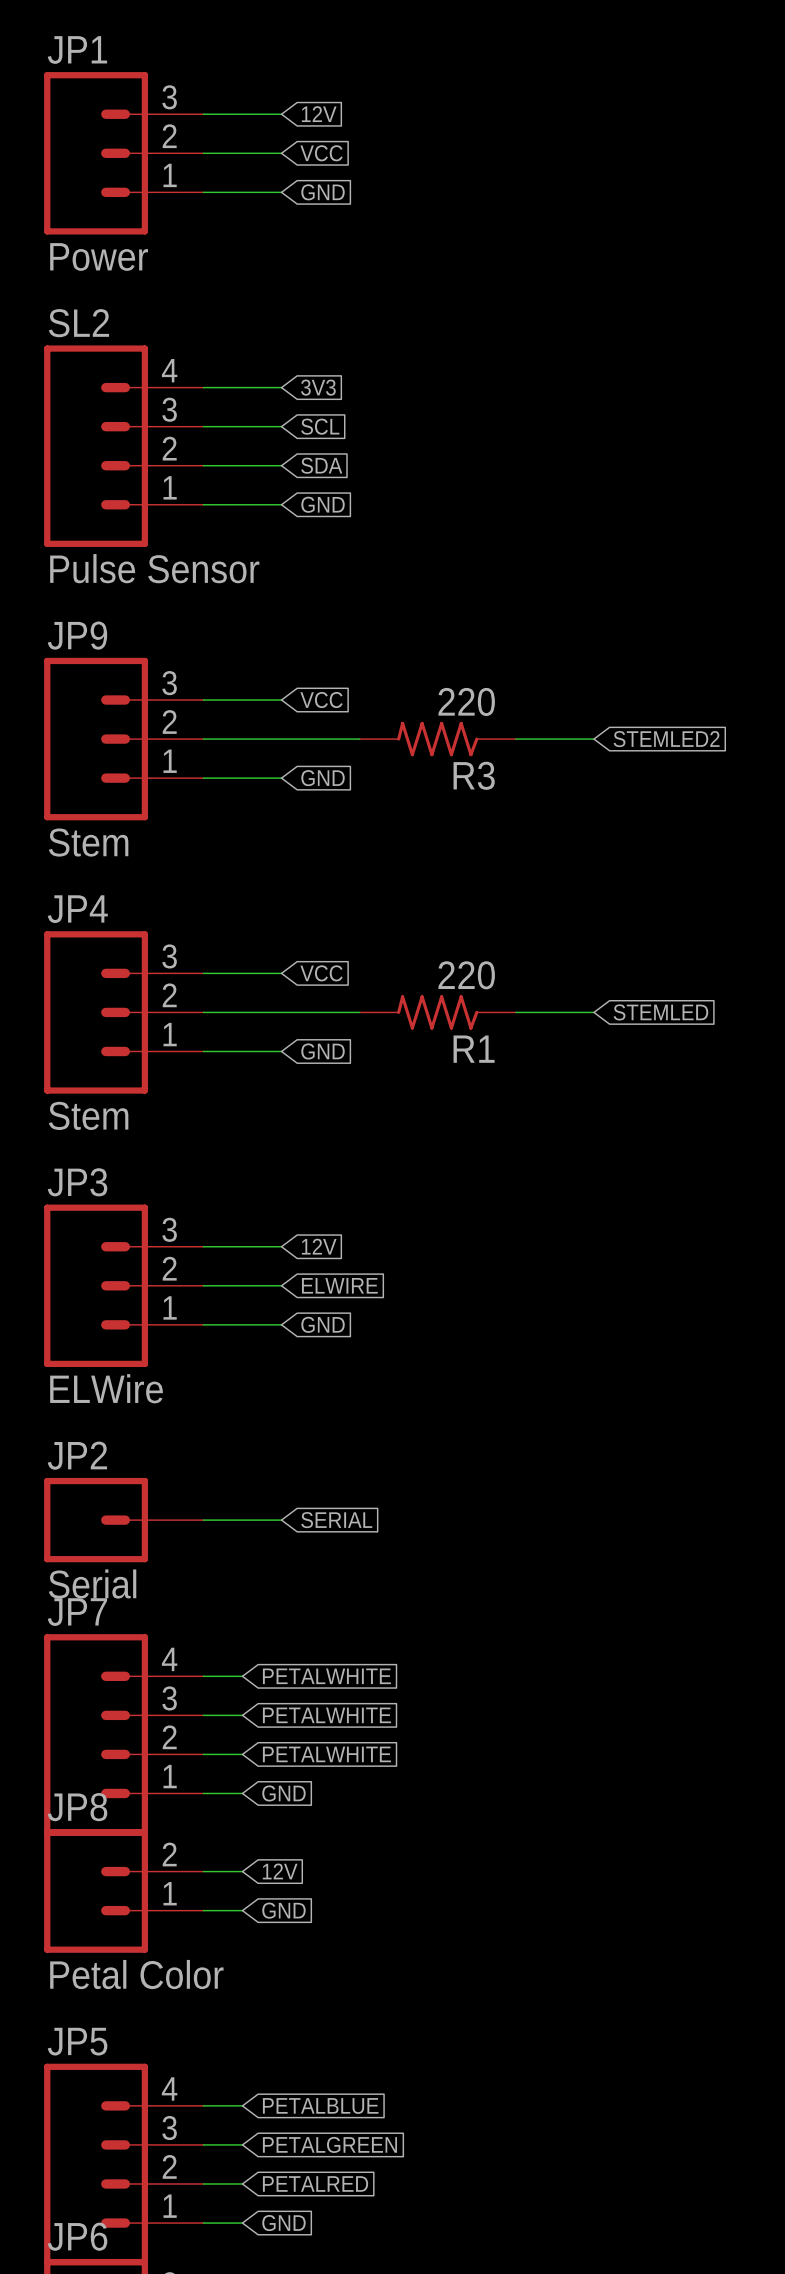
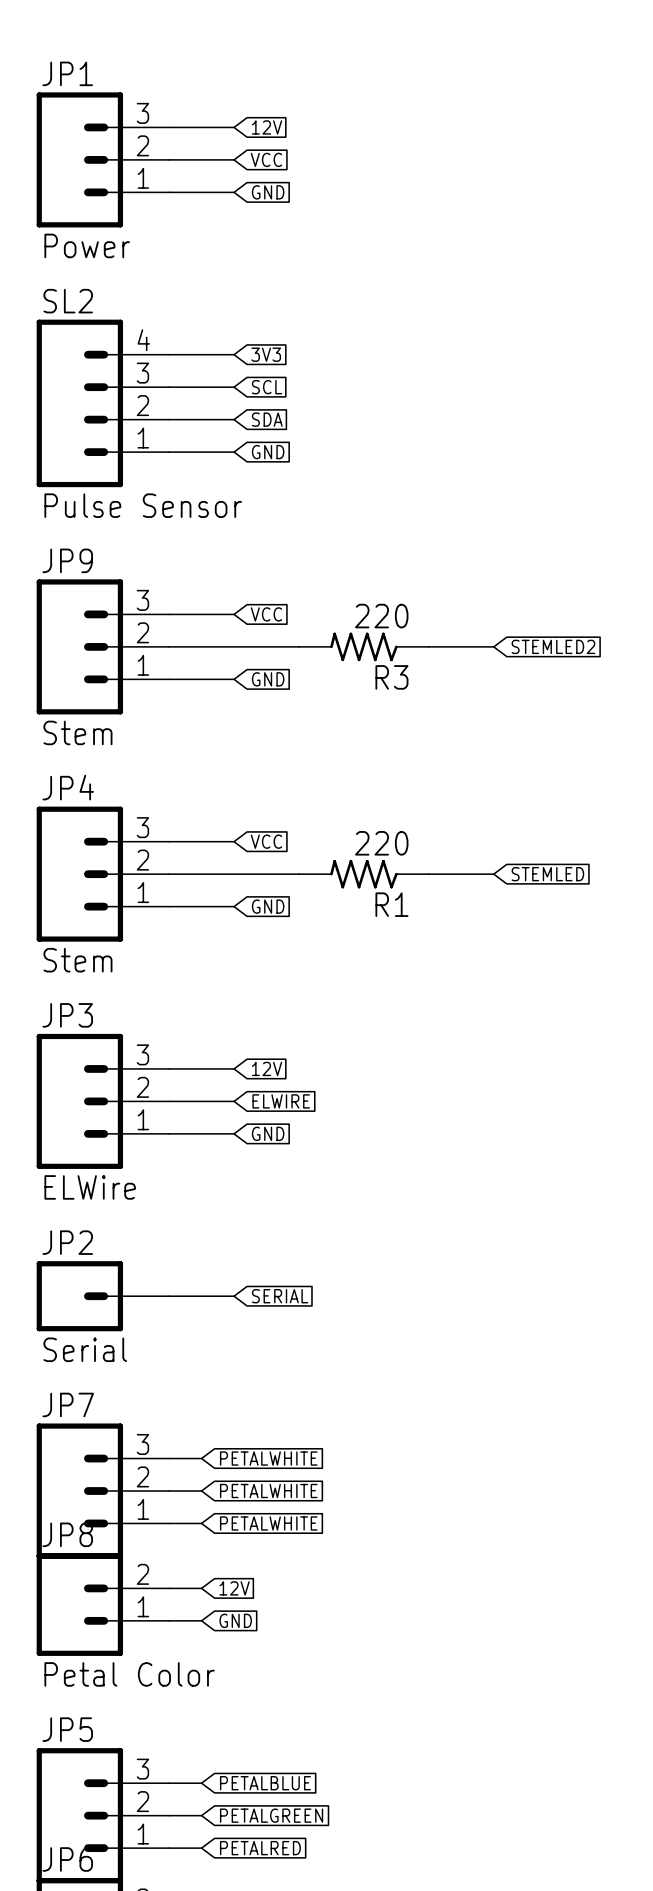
wire: (203, 114) (281, 114) -> none
global label: 12V (319, 114) -> none
JP1 position: (123, 153) -> (102, 159)
global label: VCC (321, 153) -> 12V (267, 127)
global label: GND (323, 192) -> VCC (266, 159)
global label: none -> GND (268, 192)
wire: (203, 387) (281, 387) -> (169, 192) (234, 192)
global label: 3V3 (318, 387) -> none
global label: SCL (320, 426) -> 3V3 (266, 354)
SL2 position: (123, 446) -> (102, 403)
global label: SDA (321, 465) -> SCL (267, 387)
global label: GND (323, 504) -> SDA (267, 419)
global label: none -> GND (268, 452)
wire: (203, 700) (281, 700) -> (169, 452) (234, 452)
global label position: VCC (321, 700) -> VCC (266, 614)
JP9 position: (123, 739) -> (102, 646)
wire: (281, 739) (359, 739) -> (234, 646) (298, 646)
R3 position: (437, 739) -> (363, 646)
wire: (515, 739) (593, 739) -> (428, 646) (493, 646)
global label position: STEMLED2 (666, 739) -> STEMLED2 (553, 646)
global label position: GND (323, 778) -> GND (268, 679)
wire: (203, 973) (281, 973) -> (169, 679) (234, 679)
global label position: VCC (321, 973) -> VCC (266, 841)
JP4 position: (123, 1012) -> (102, 874)
wire: (281, 1012) (359, 1012) -> (234, 874) (298, 874)
R1 position: (437, 1012) -> (363, 874)
wire: (515, 1012) (593, 1012) -> (428, 874) (493, 874)
global label position: STEMLED (660, 1012) -> STEMLED (547, 874)
global label position: GND (323, 1051) -> GND (268, 906)
wire: (203, 1246) (281, 1246) -> (169, 906) (234, 906)
global label: 12V (319, 1246) -> none
JP3 position: (123, 1285) -> (102, 1101)
global label: ELWIRE (339, 1285) -> 12V (267, 1068)
global label: GND (323, 1324) -> ELWIRE (281, 1101)
global label: none -> GND (268, 1133)
JP2 position: (123, 1520) -> (102, 1296)
wire: (203, 1520) (281, 1520) -> (169, 1133) (234, 1133)
global label position: SERIAL (336, 1520) -> SERIAL (280, 1296)
wire: none -> (169, 1296) (234, 1296)
JP7 symbol: [44, 1634, 204, 1836] -> [36, 1423, 170, 1559]
wire: (203, 1676) (242, 1676) -> none
global label: PETALWHITE (326, 1676) -> none
wire: (203, 1715) (242, 1715) -> (169, 1523) (201, 1523)
global label: PETALWHITE (326, 1715) -> none
global label: GND (283, 1793) -> PETALWHITE (268, 1491)
global label: none -> PETALWHITE (268, 1523)
wire: (203, 1871) (242, 1871) -> none
global label: 12V (280, 1871) -> none
JP8 position: (123, 1891) -> (102, 1604)
global label: GND (283, 1910) -> 12V (234, 1588)
global label: none -> GND (235, 1620)
JP5 symbol: [44, 2063, 204, 2266] -> [36, 1748, 170, 1884]
wire: (203, 2105) (242, 2105) -> (169, 1620) (201, 1620)
global label: PETALBLUE (320, 2106) -> none
global label: PETALGREEN (329, 2144) -> PETALBLUE (265, 1783)
global label: PETALRED (315, 2183) -> PETALGREEN (271, 1815)
global label: GND (283, 2223) -> PETALRED (260, 1848)

